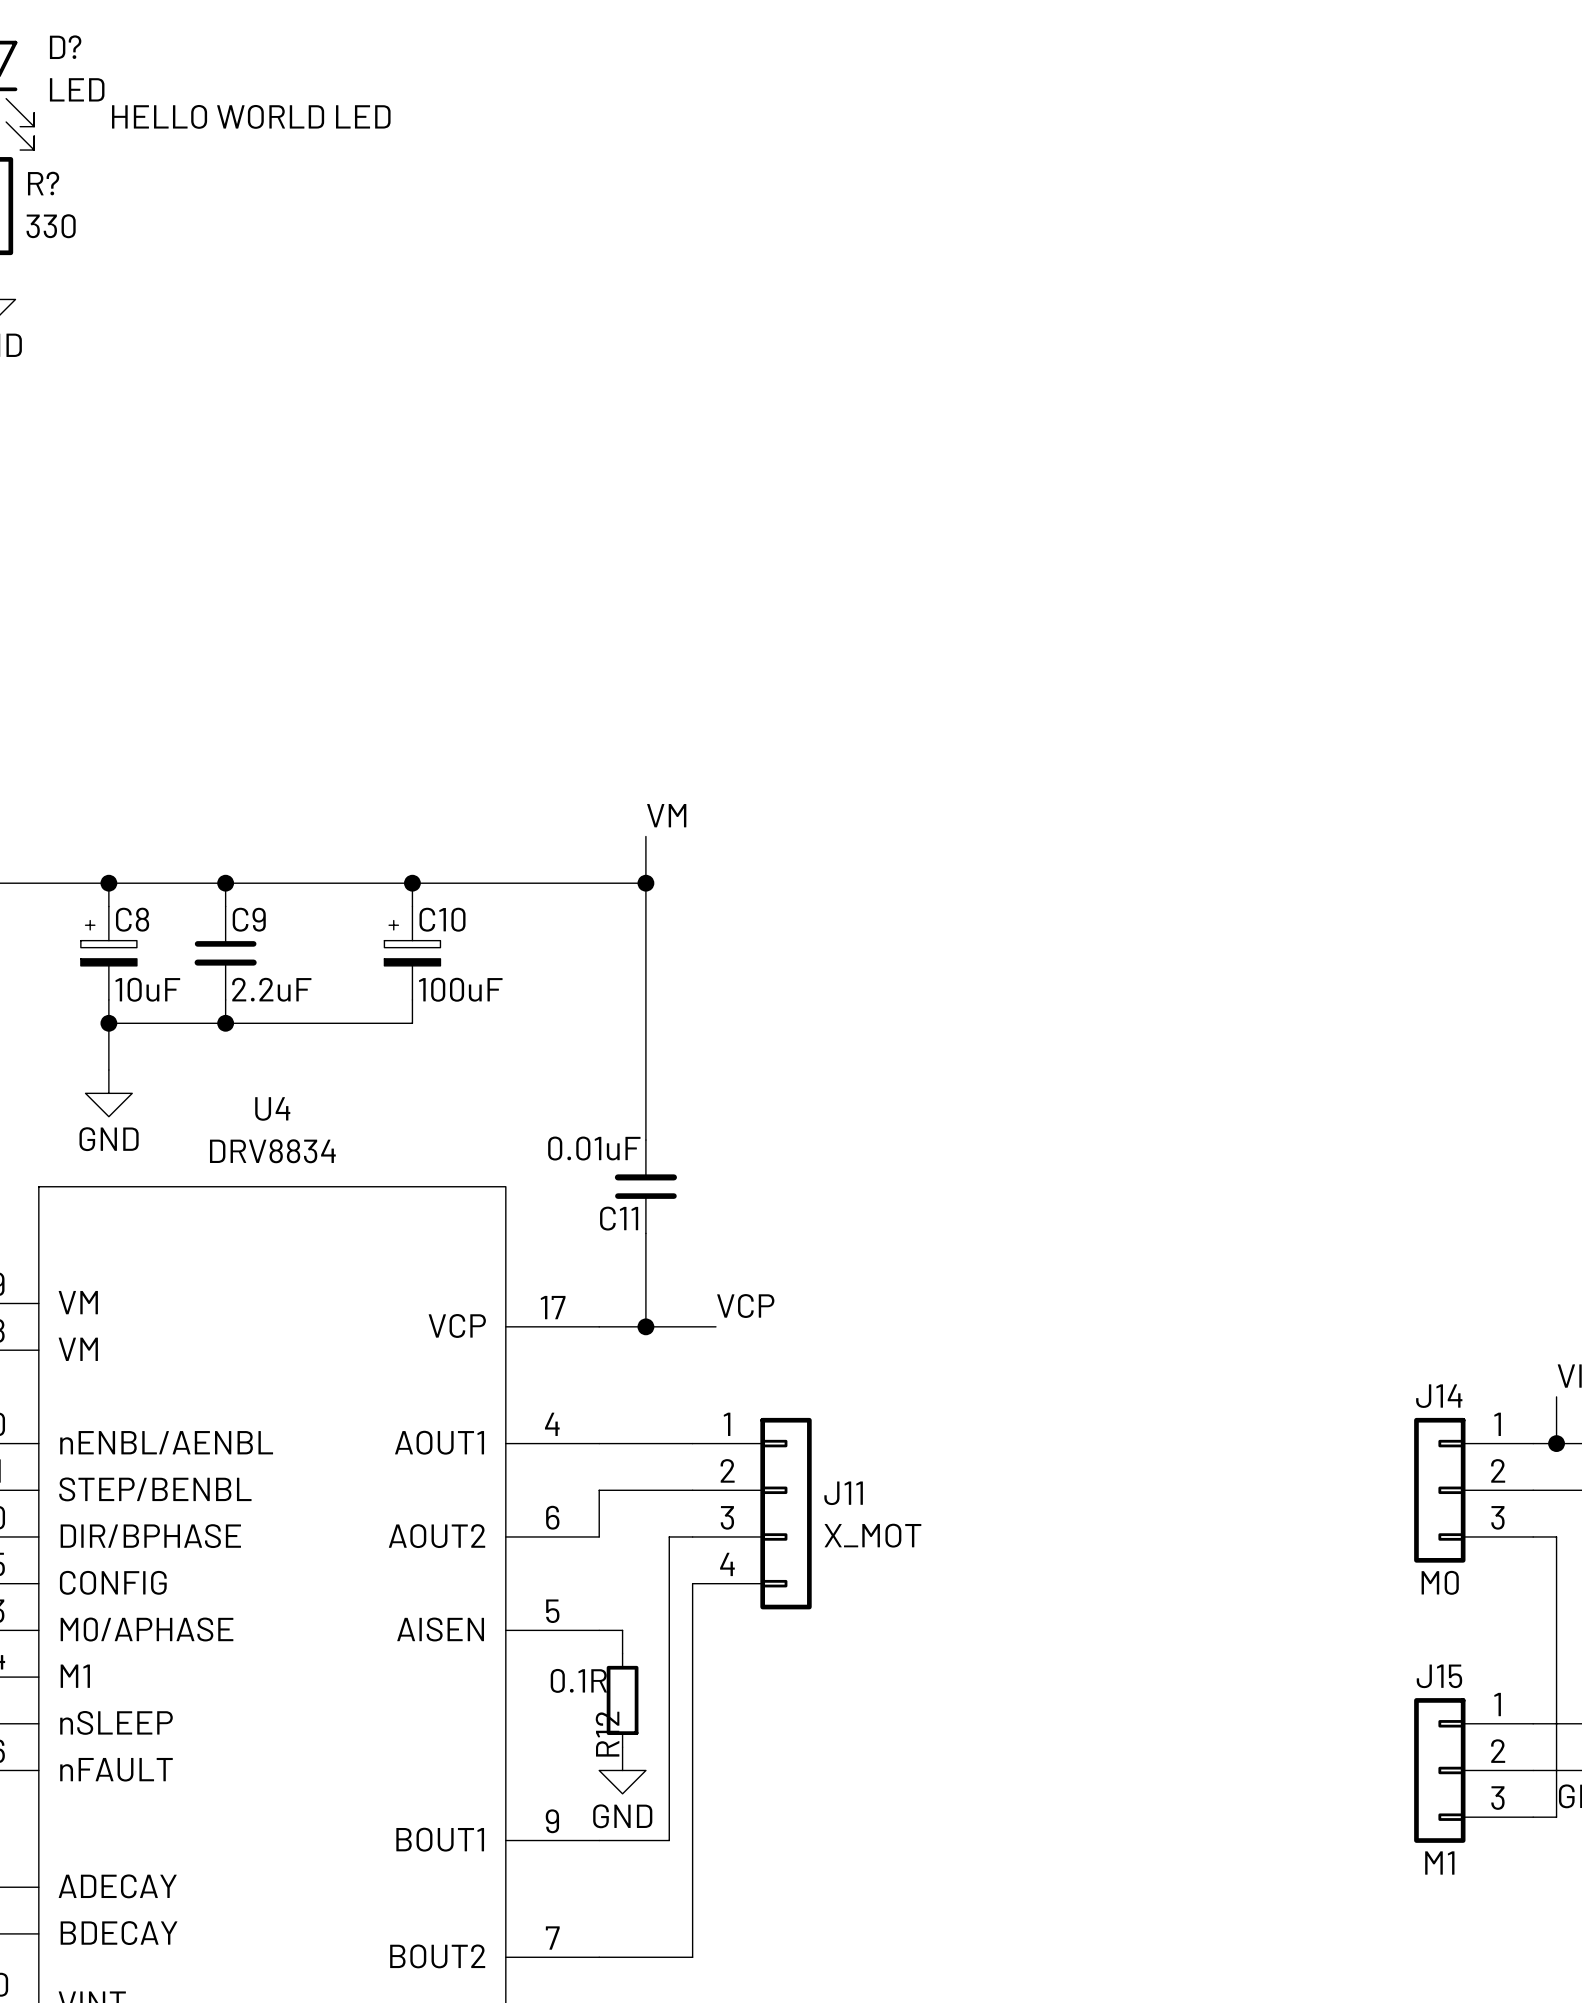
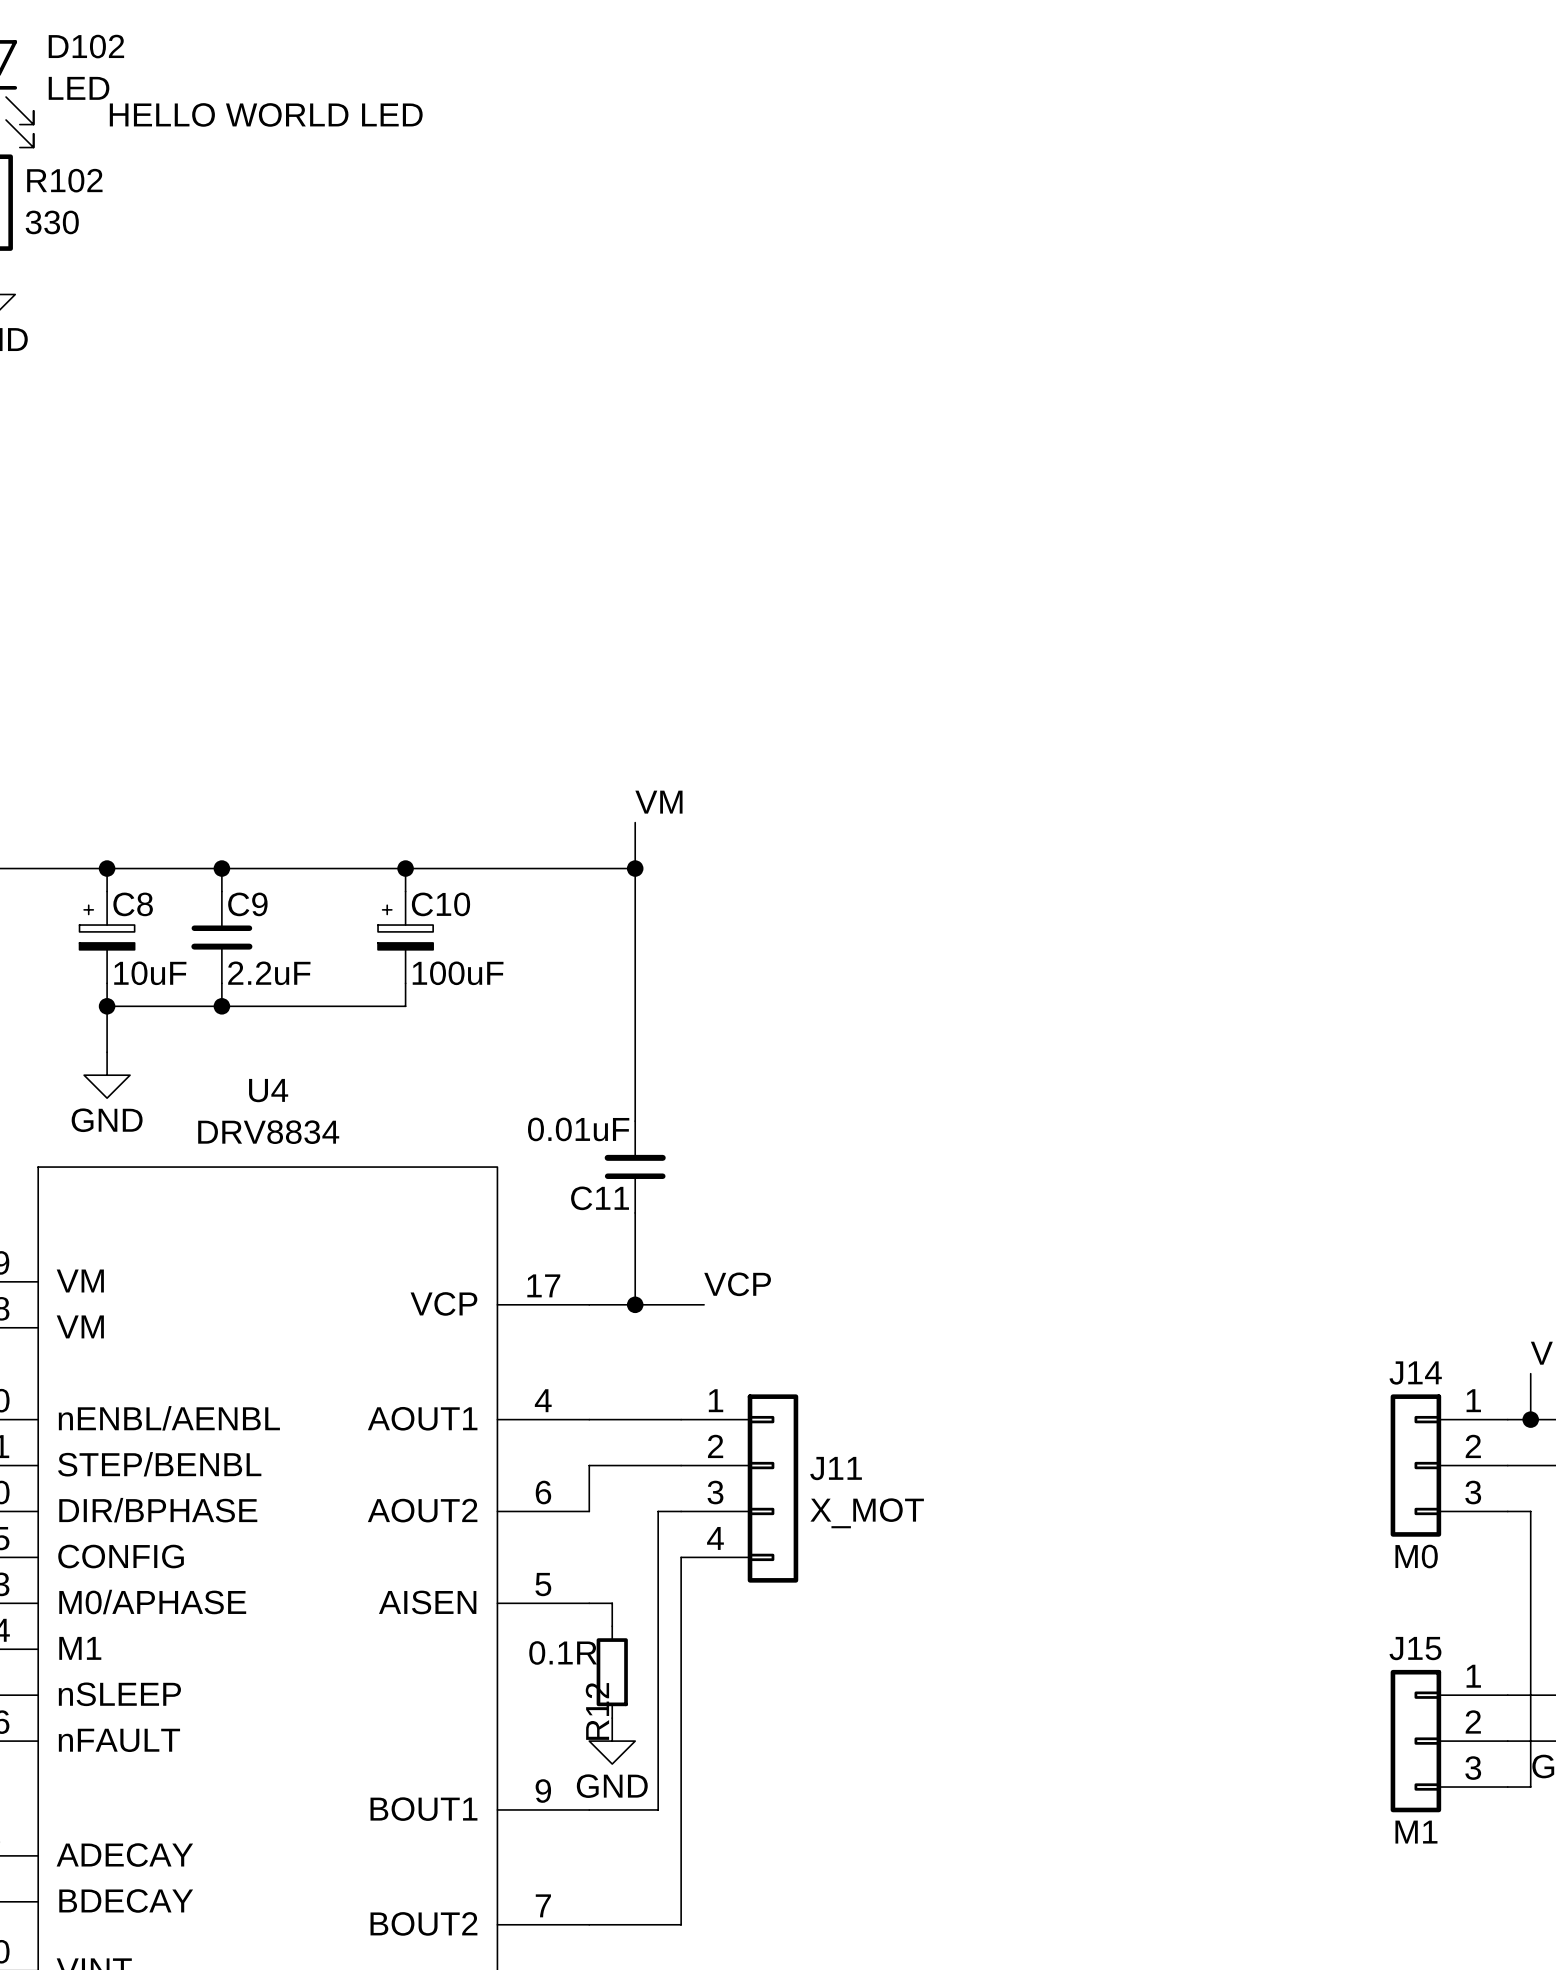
D? name: D? (65, 47) -> D102 (86, 46)
R? name: R? (43, 183) -> R102 (64, 180)

